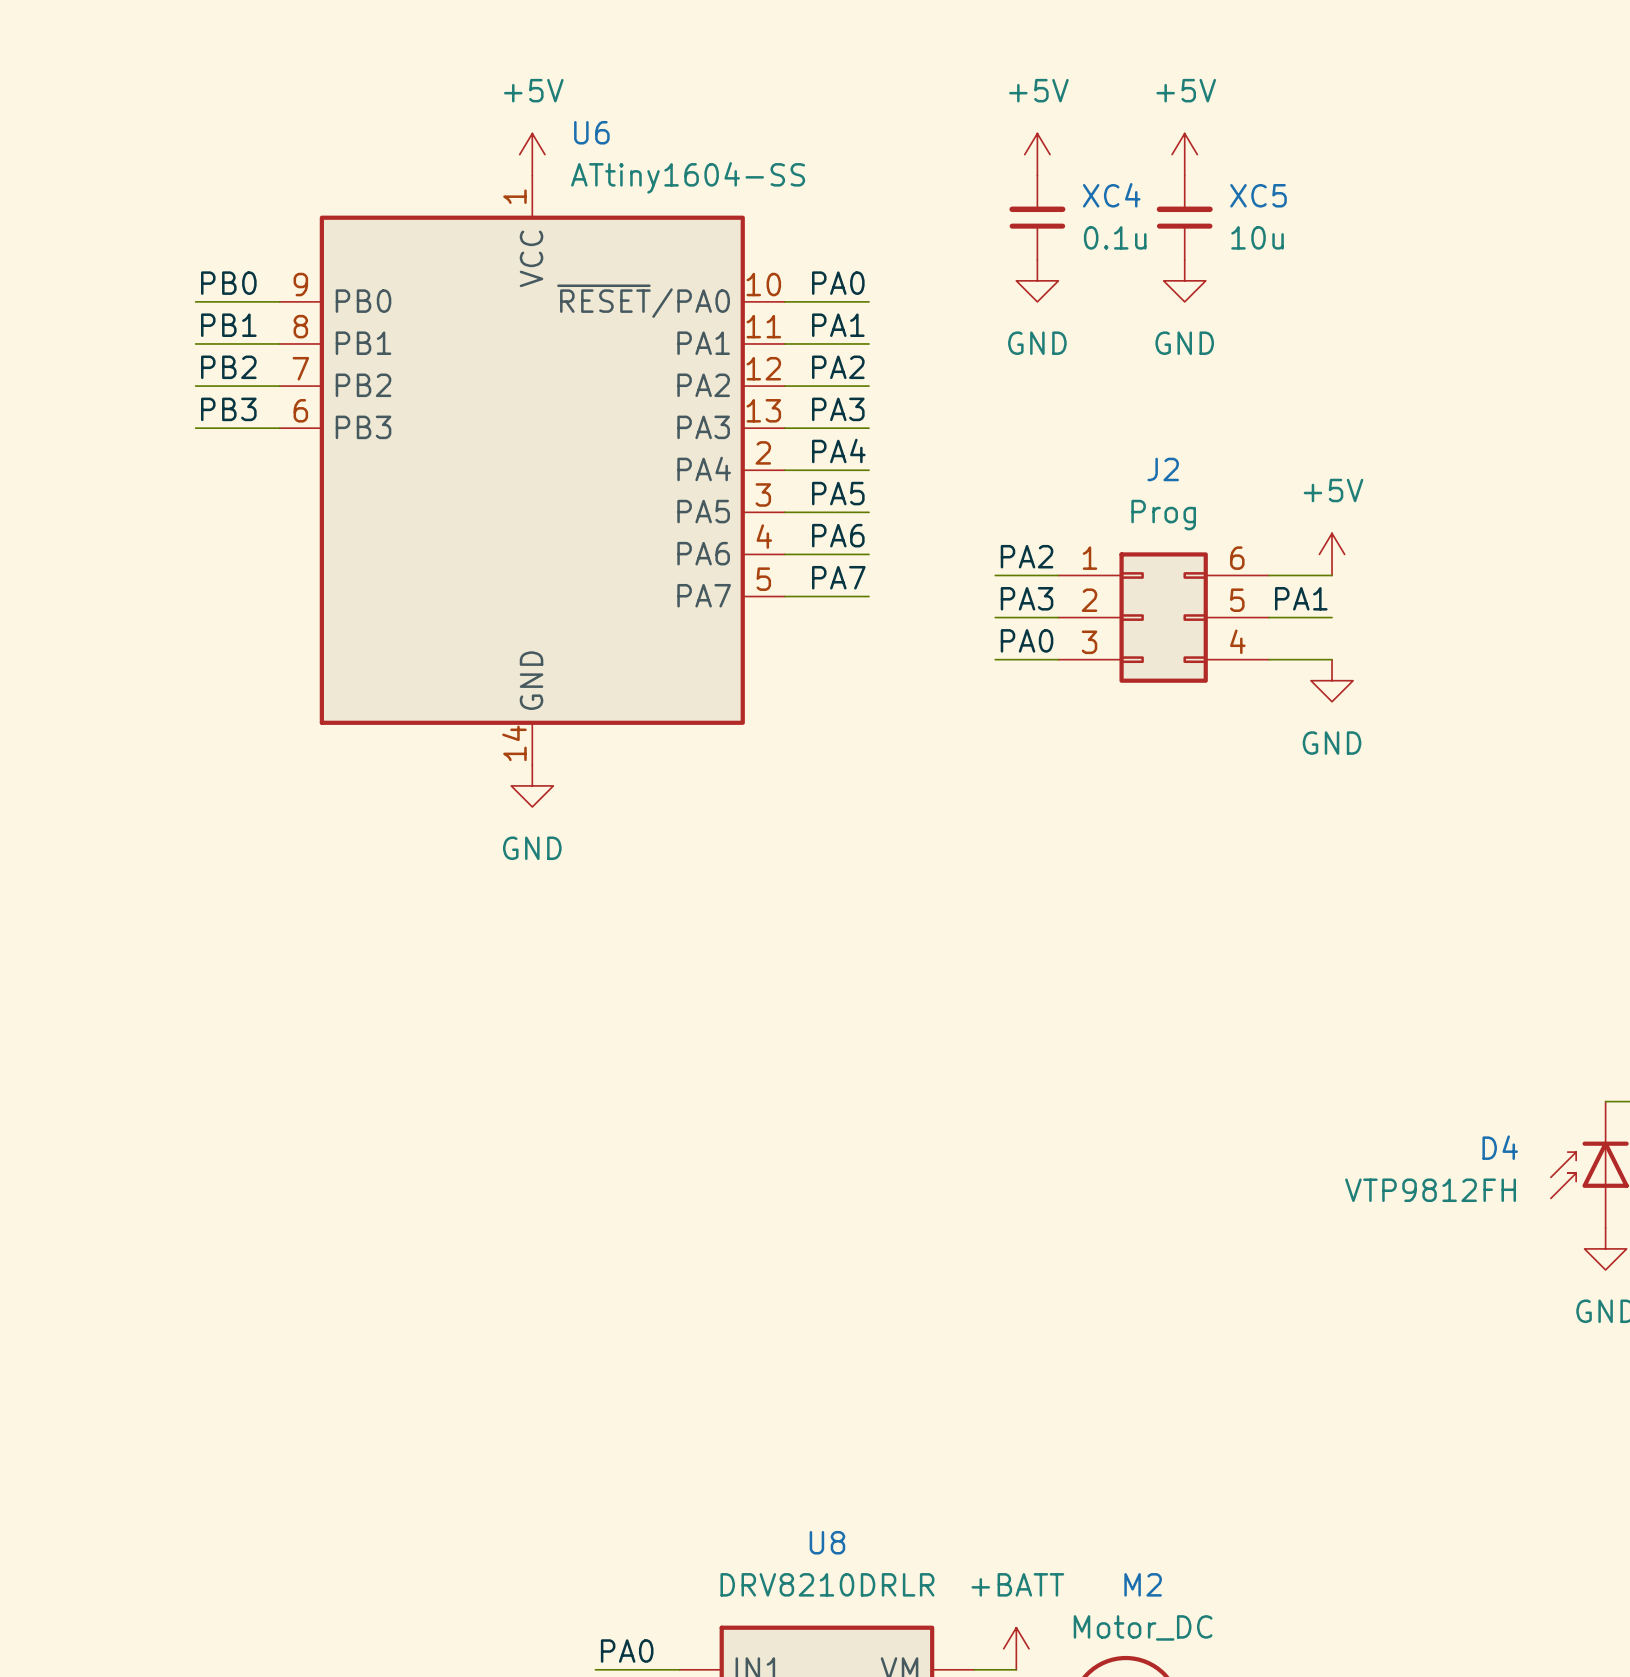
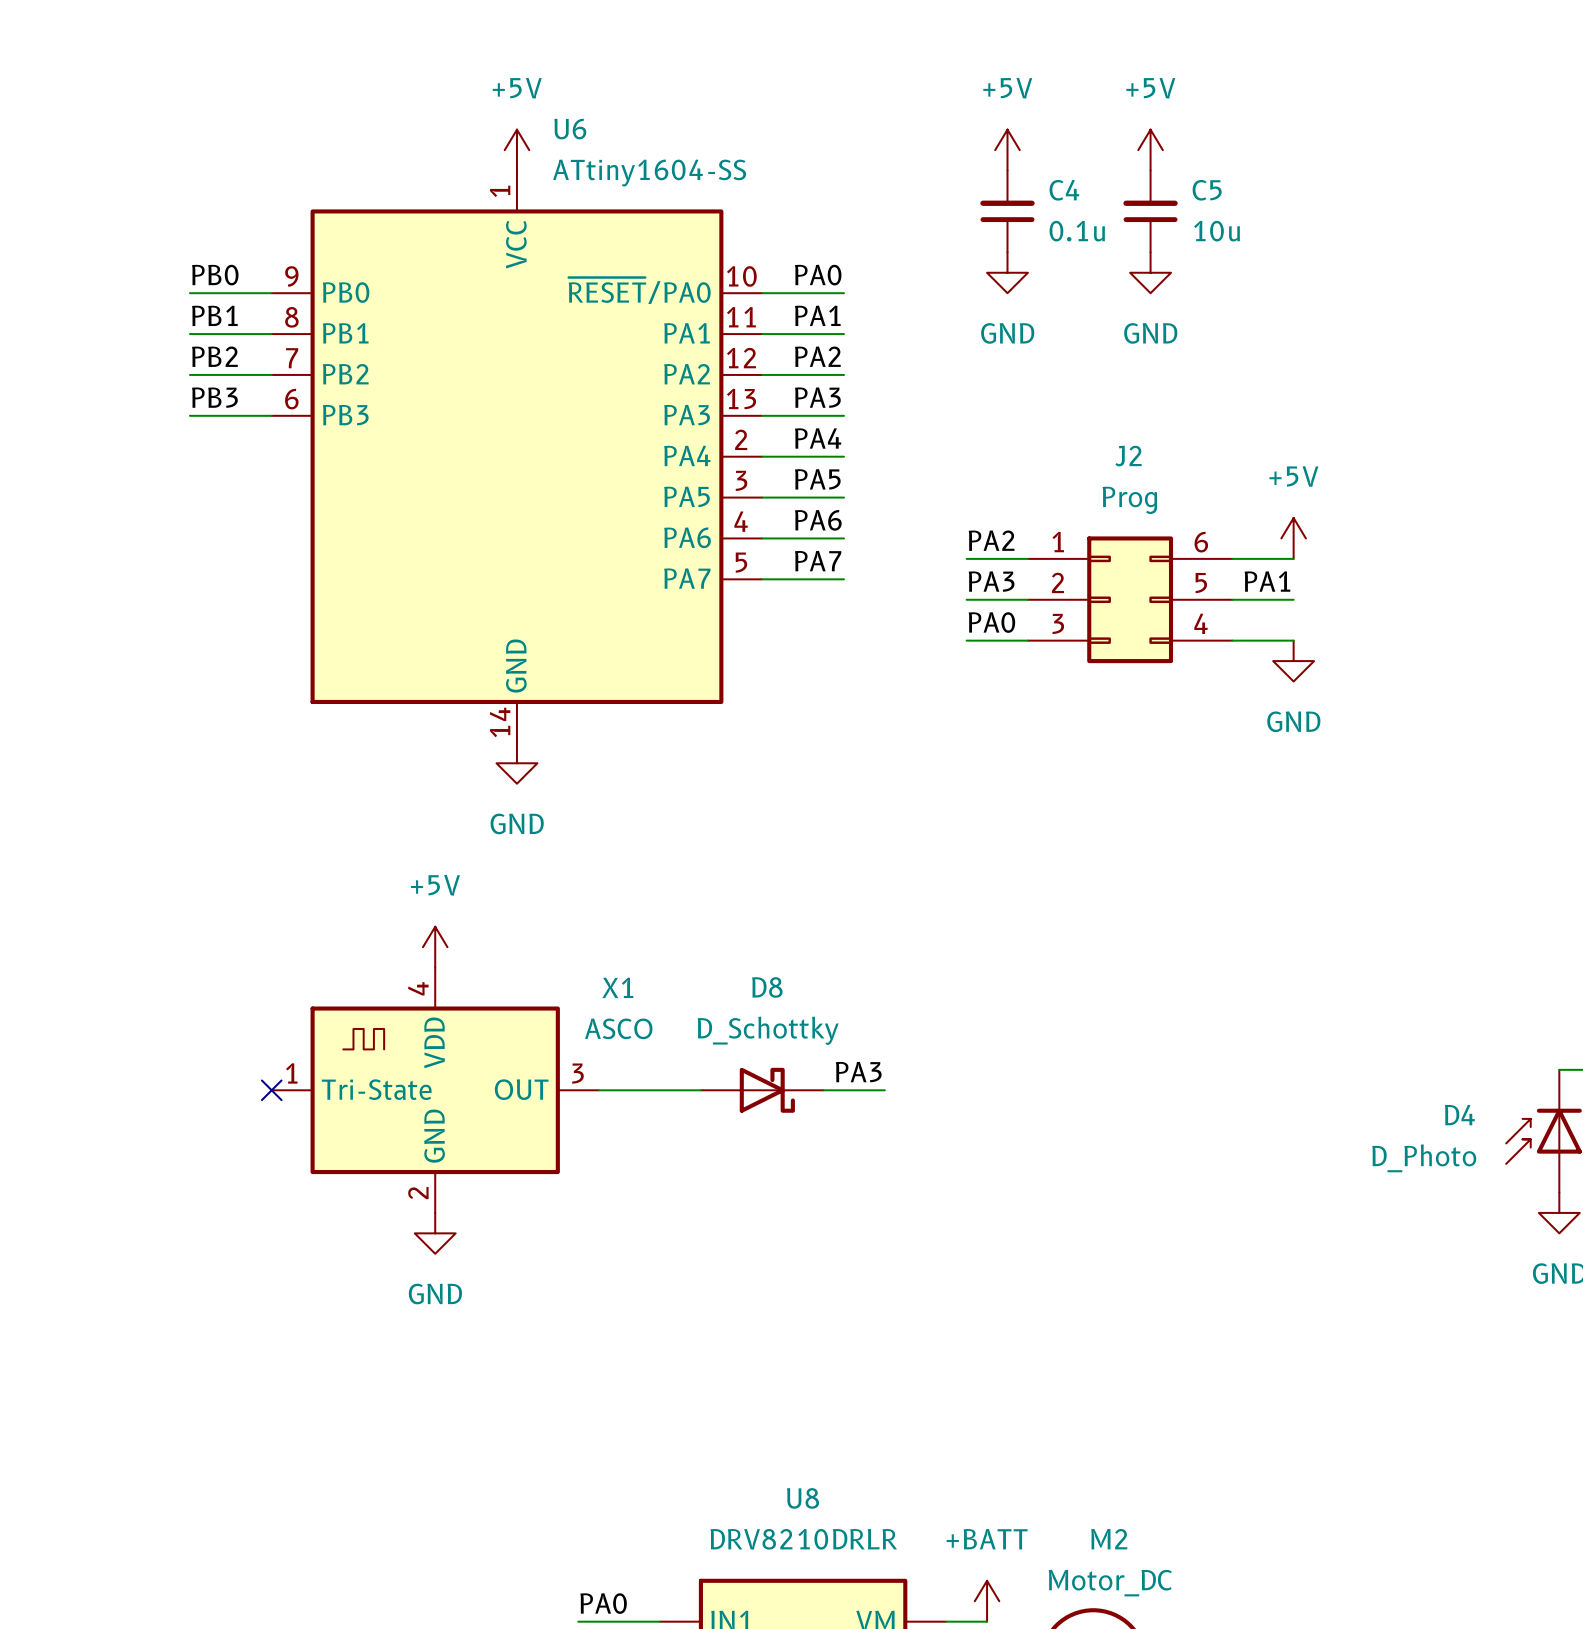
XC4 name: XC4 (1111, 195) -> C4 (1064, 190)
XC5 name: XC5 (1258, 195) -> C5 (1207, 190)
power symbol: none -> +5V (435, 947)
label: none -> PA3 (858, 1072)
no-connect mark: none -> (271, 1090)
X1: none -> ASCO (435, 1090)
wire: none -> (598, 1090) (700, 1090)
D8: none -> D_Schottky (762, 1090)
wire: none -> (823, 1090) (884, 1090)
D4 value: VTP9812FH (1430, 1190) -> D_Photo (1424, 1158)
power symbol: none -> GND (435, 1233)

